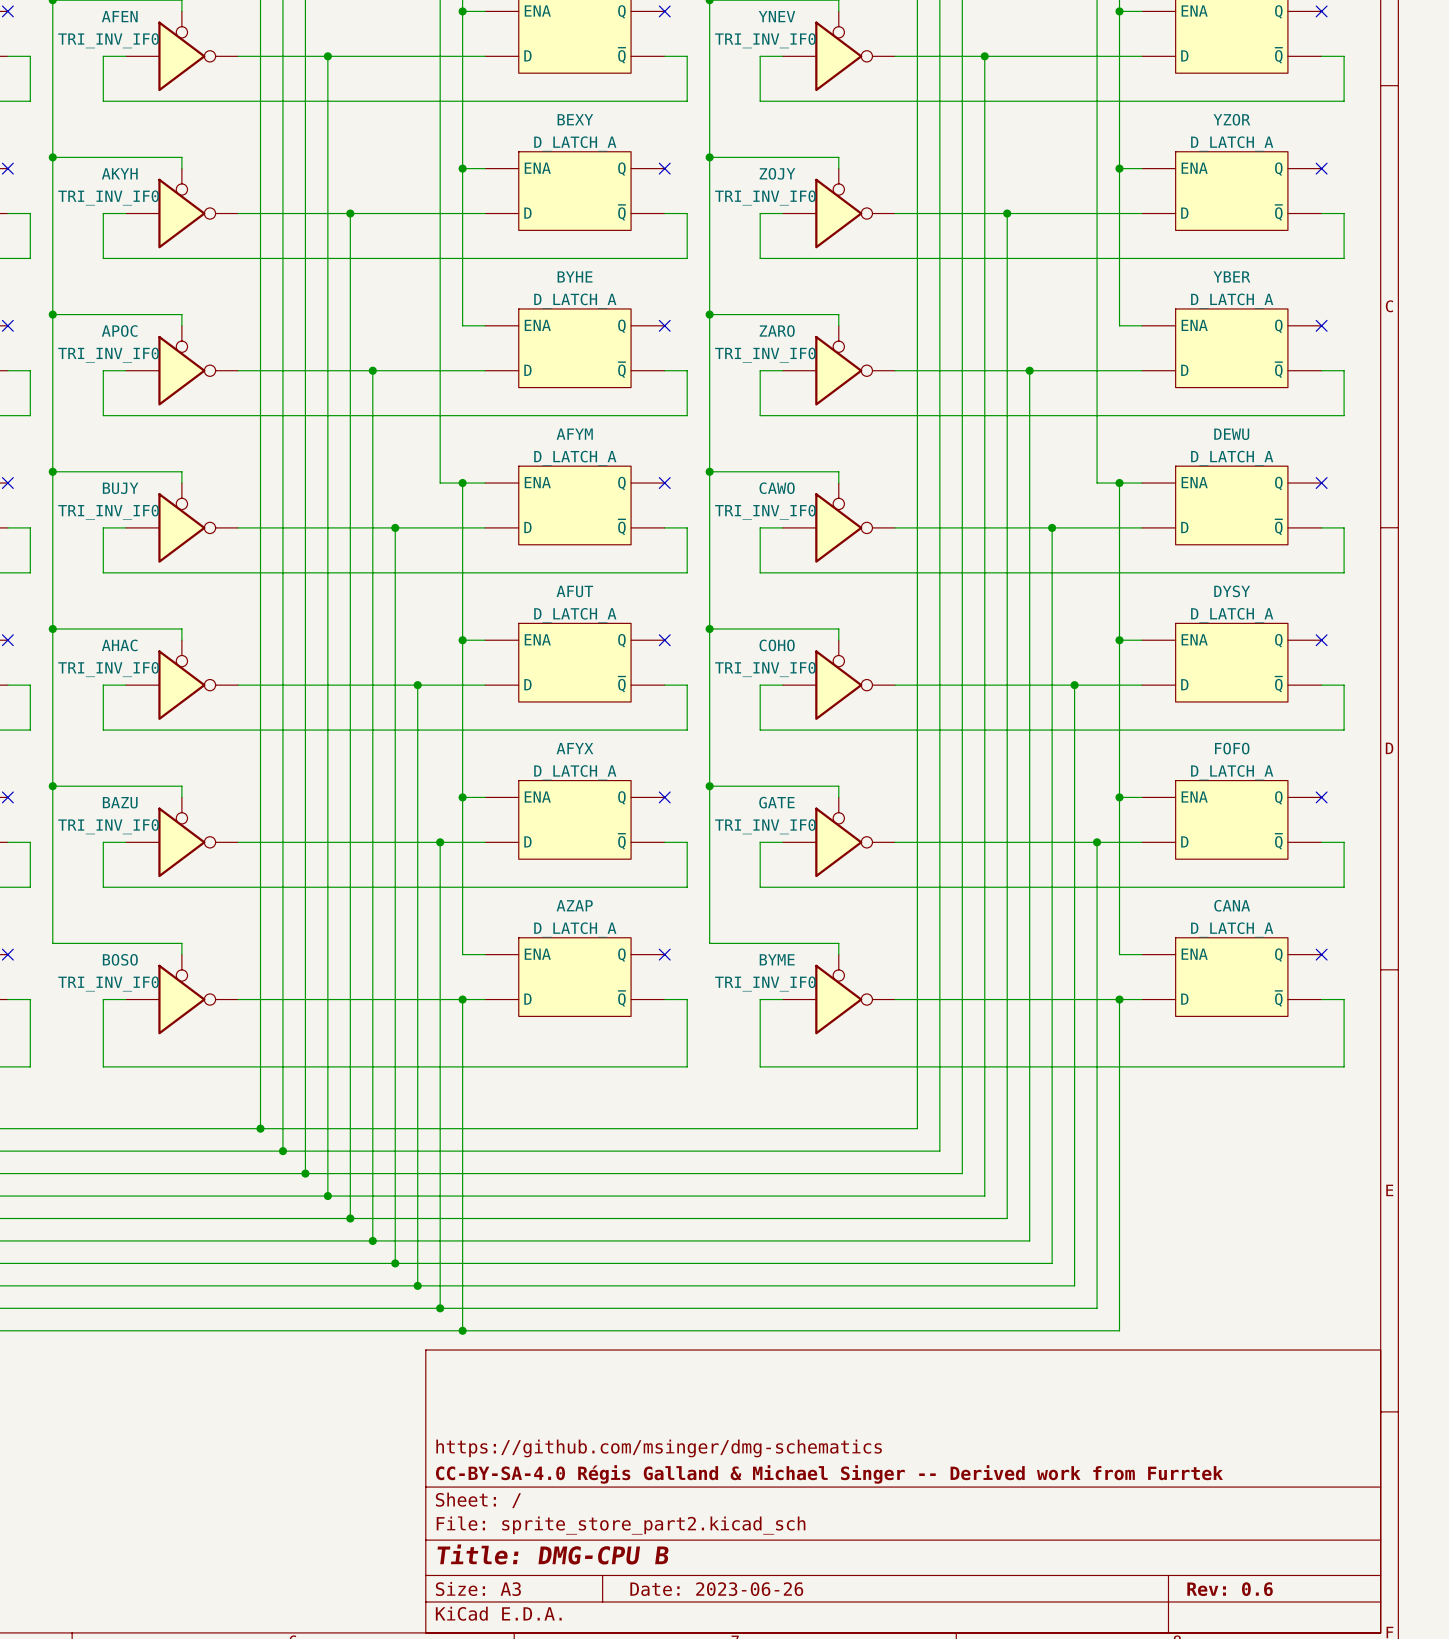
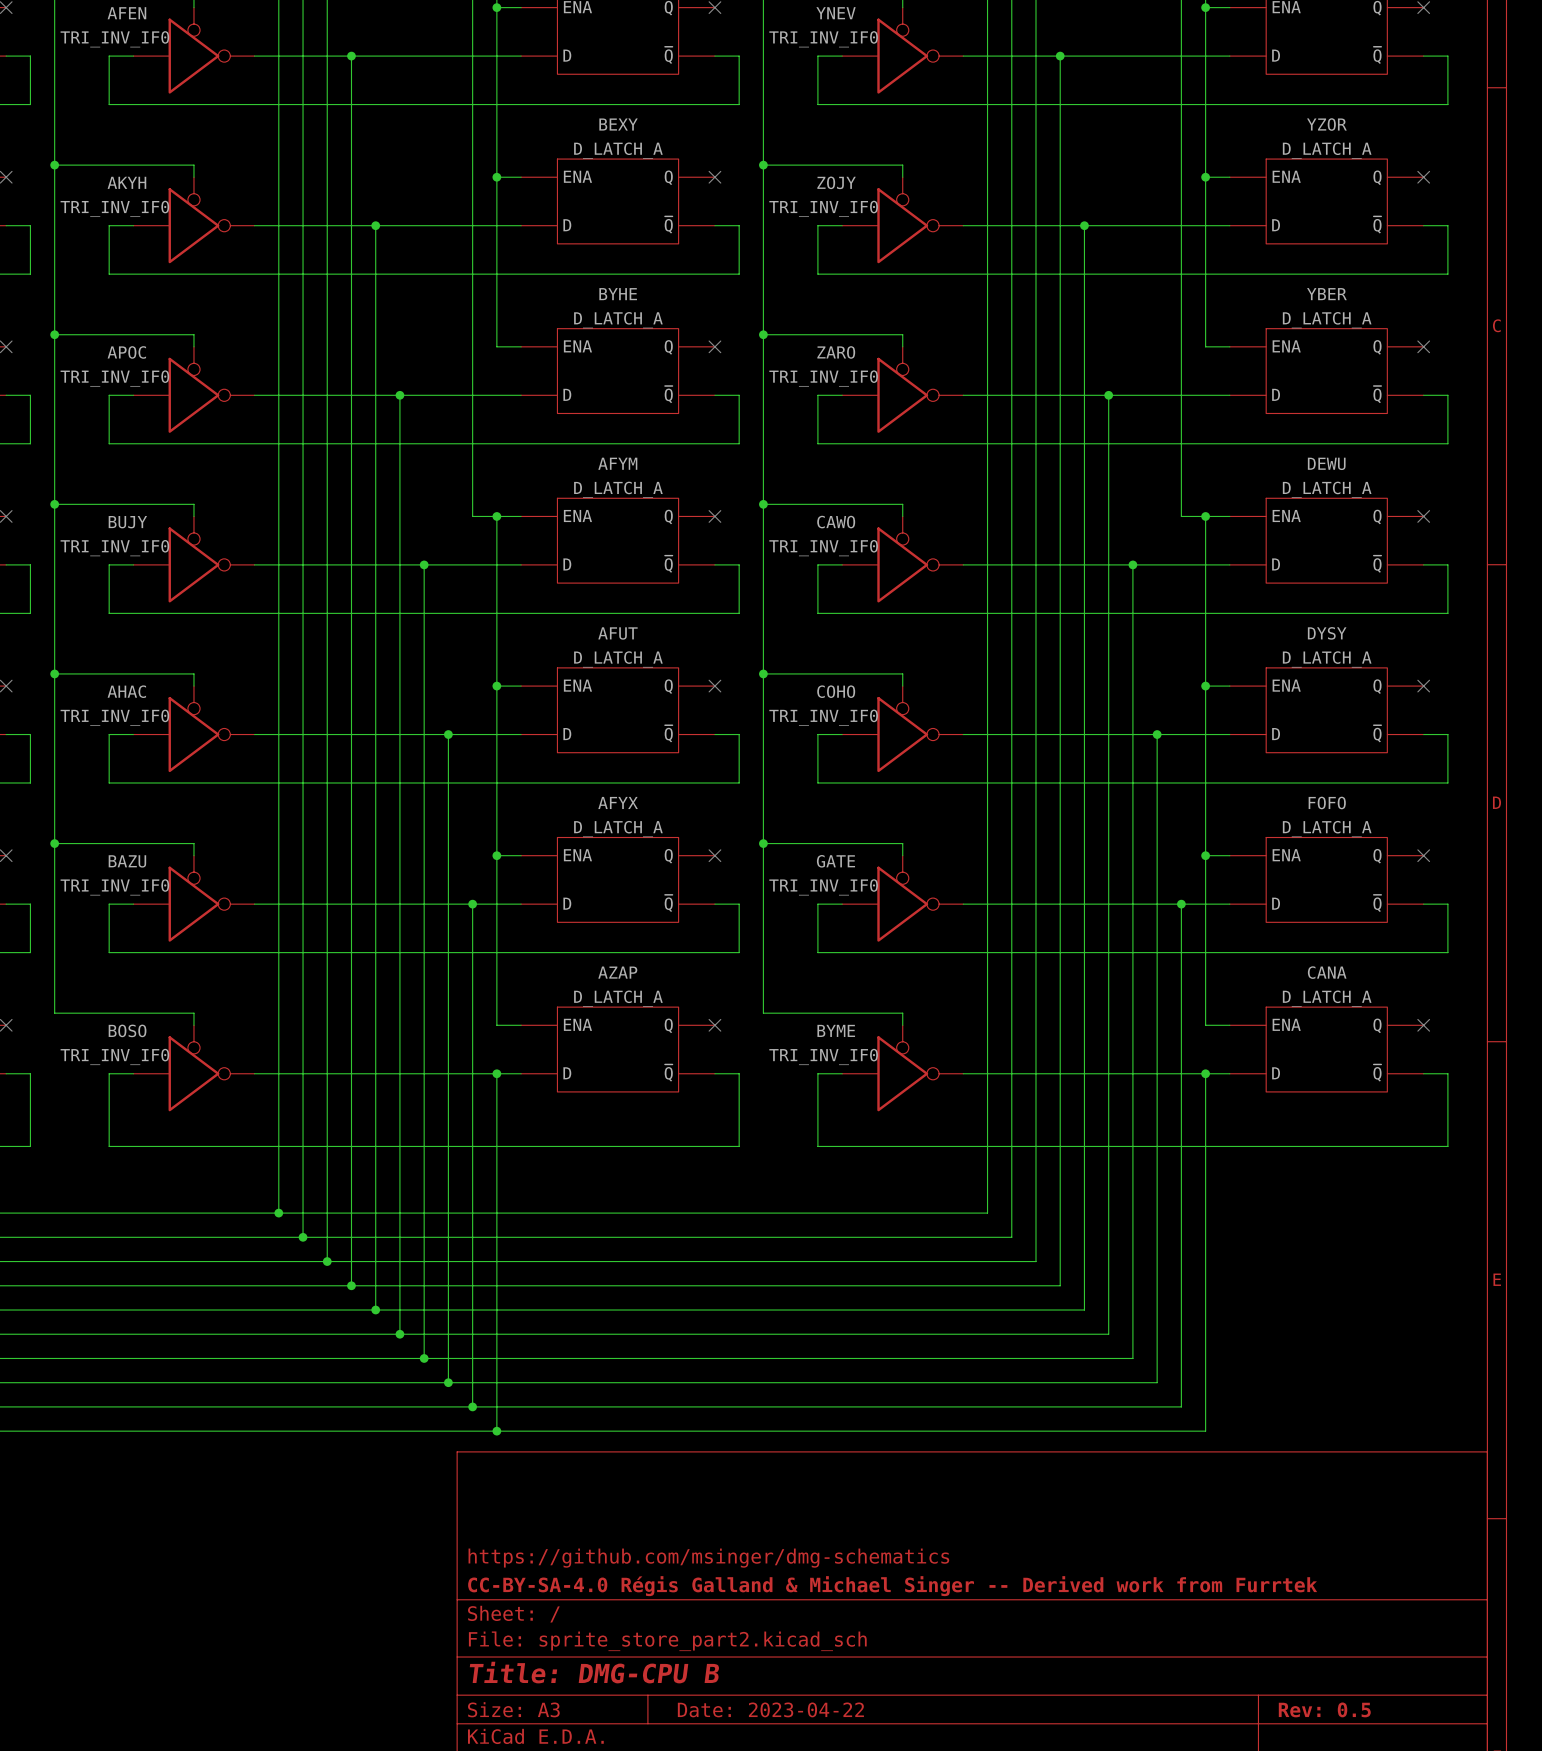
title block: Date: 2023-06-26 (716, 1589) -> Date: 2023-04-22 (770, 1709)
title block: Rev: 0.6 (1230, 1589) -> Rev: 0.5 (1324, 1709)

